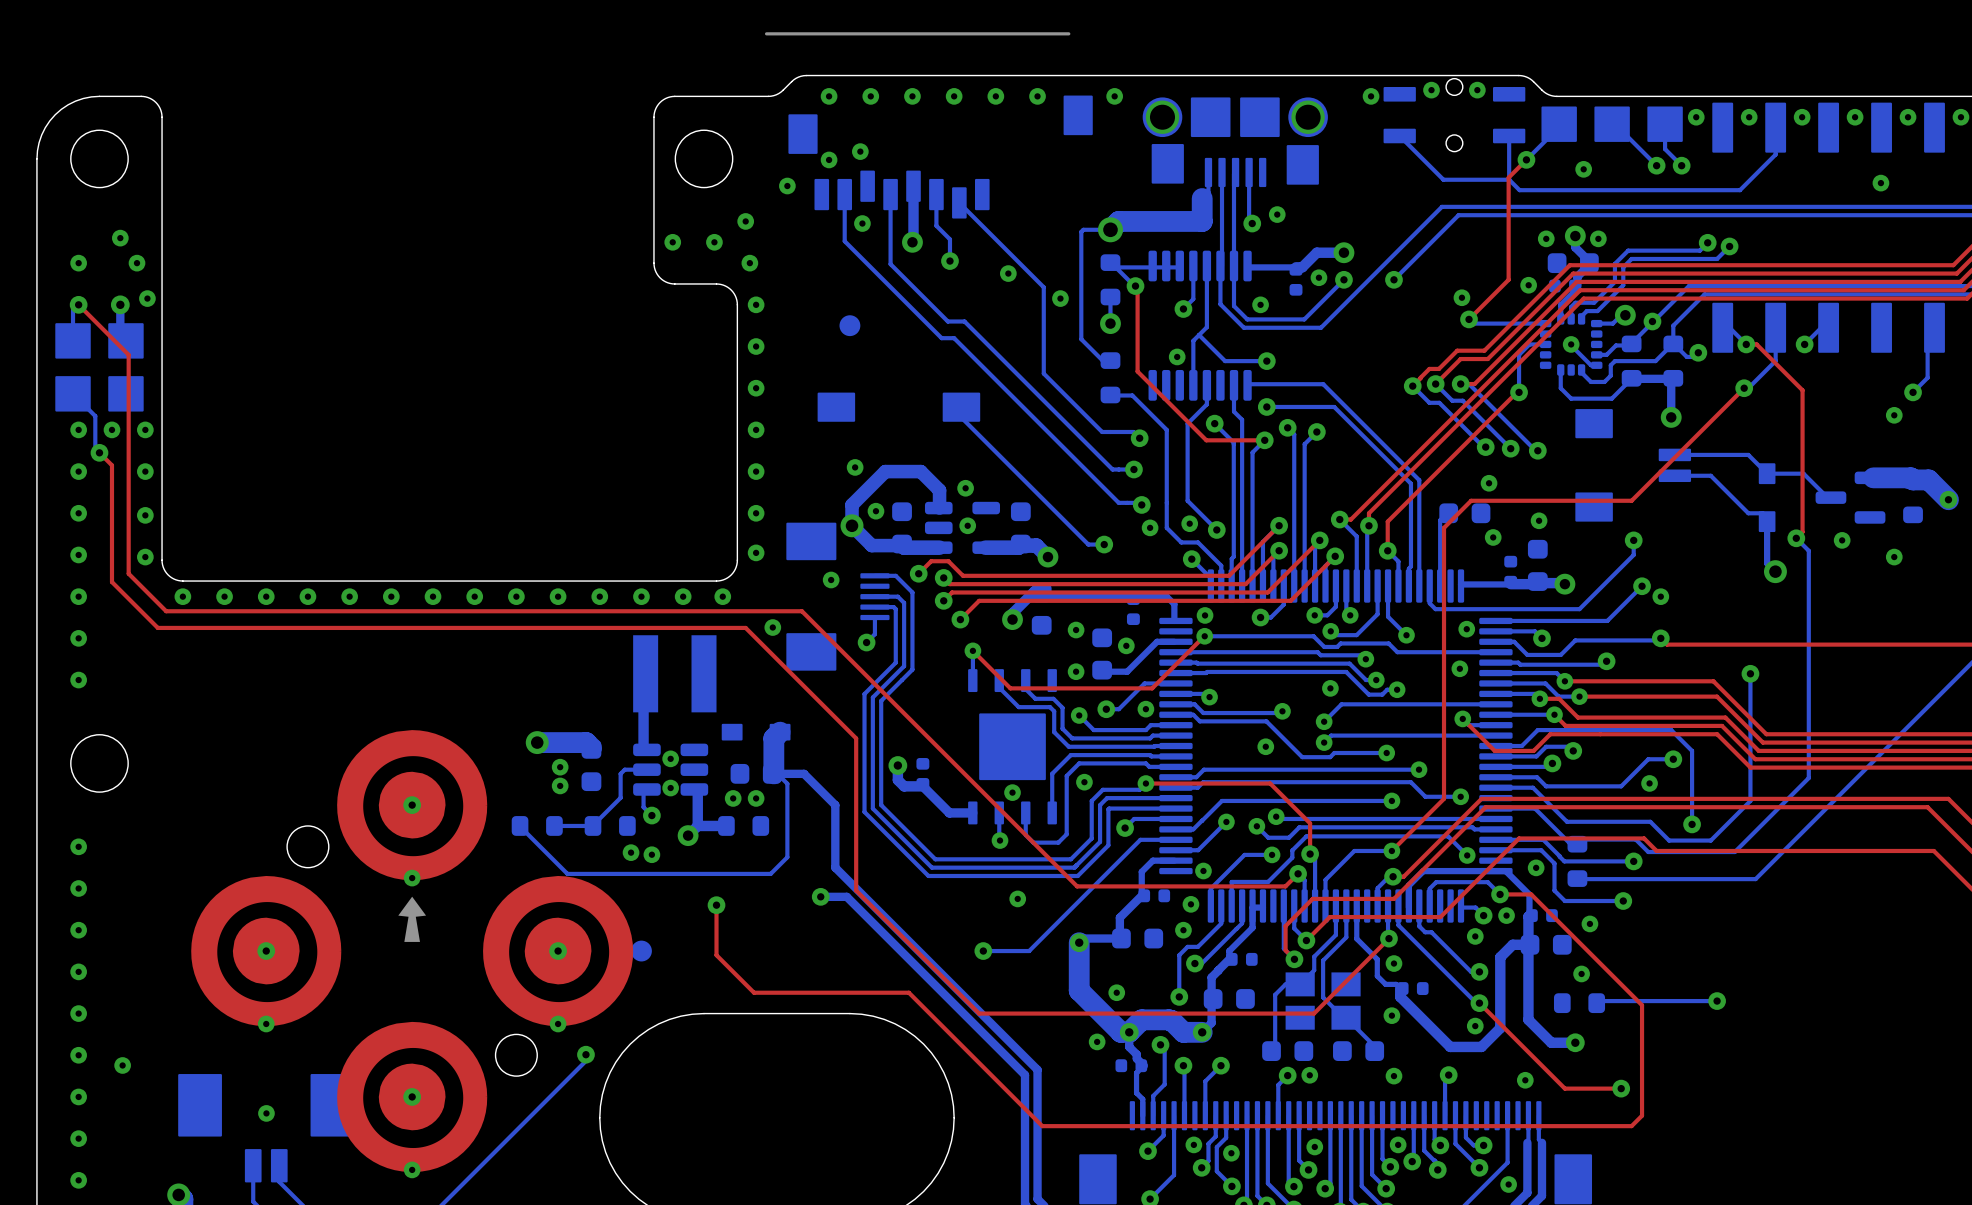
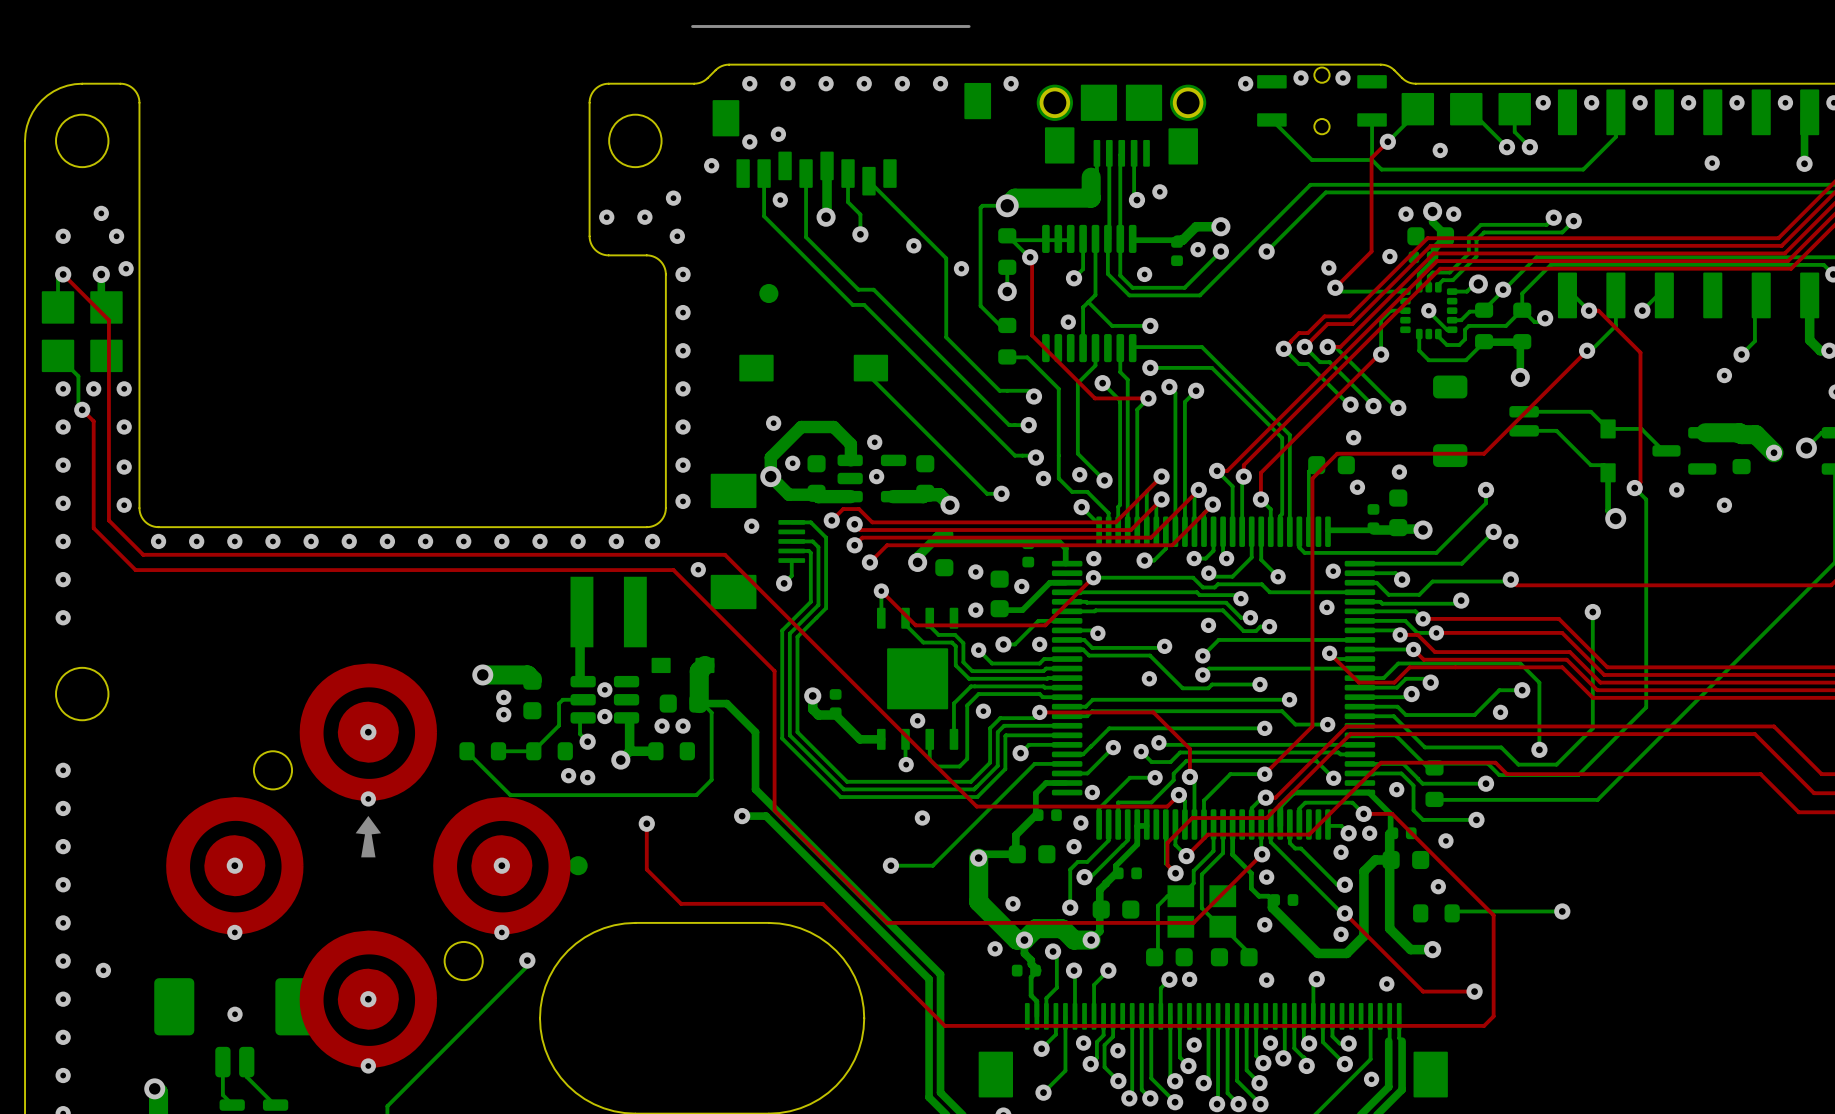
part footprint: [1575, 409, 1692, 522] -> [1433, 375, 1539, 468]
part footprint: [178, 1074, 355, 1183] -> [154, 978, 316, 1078]

